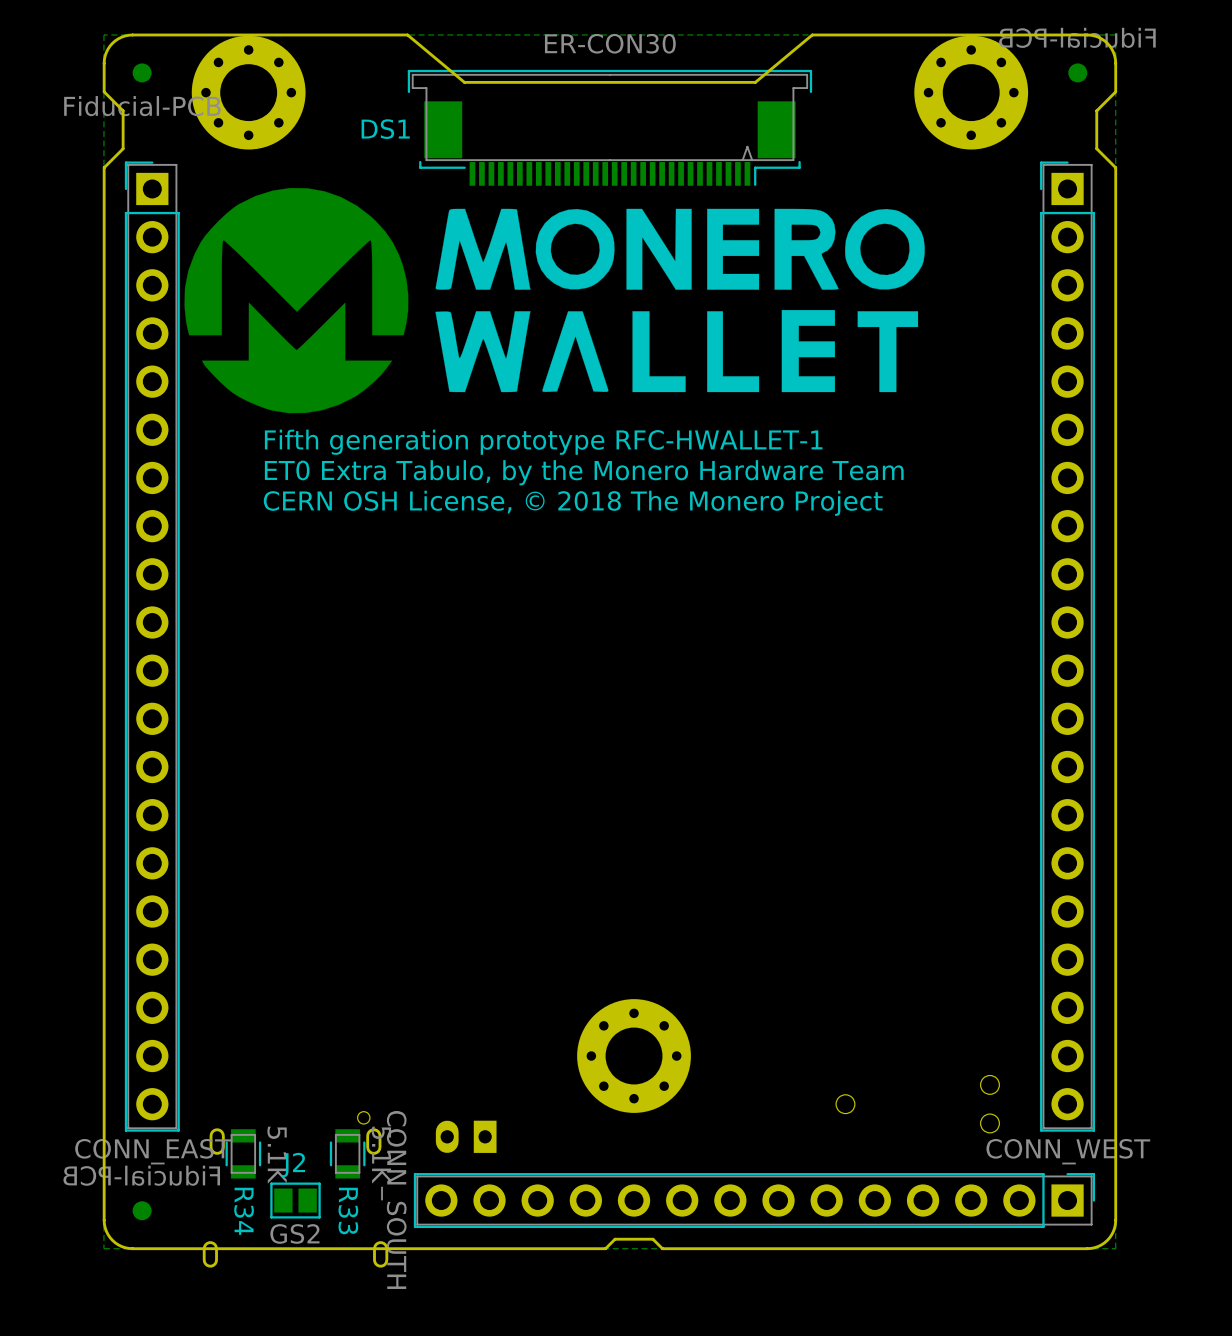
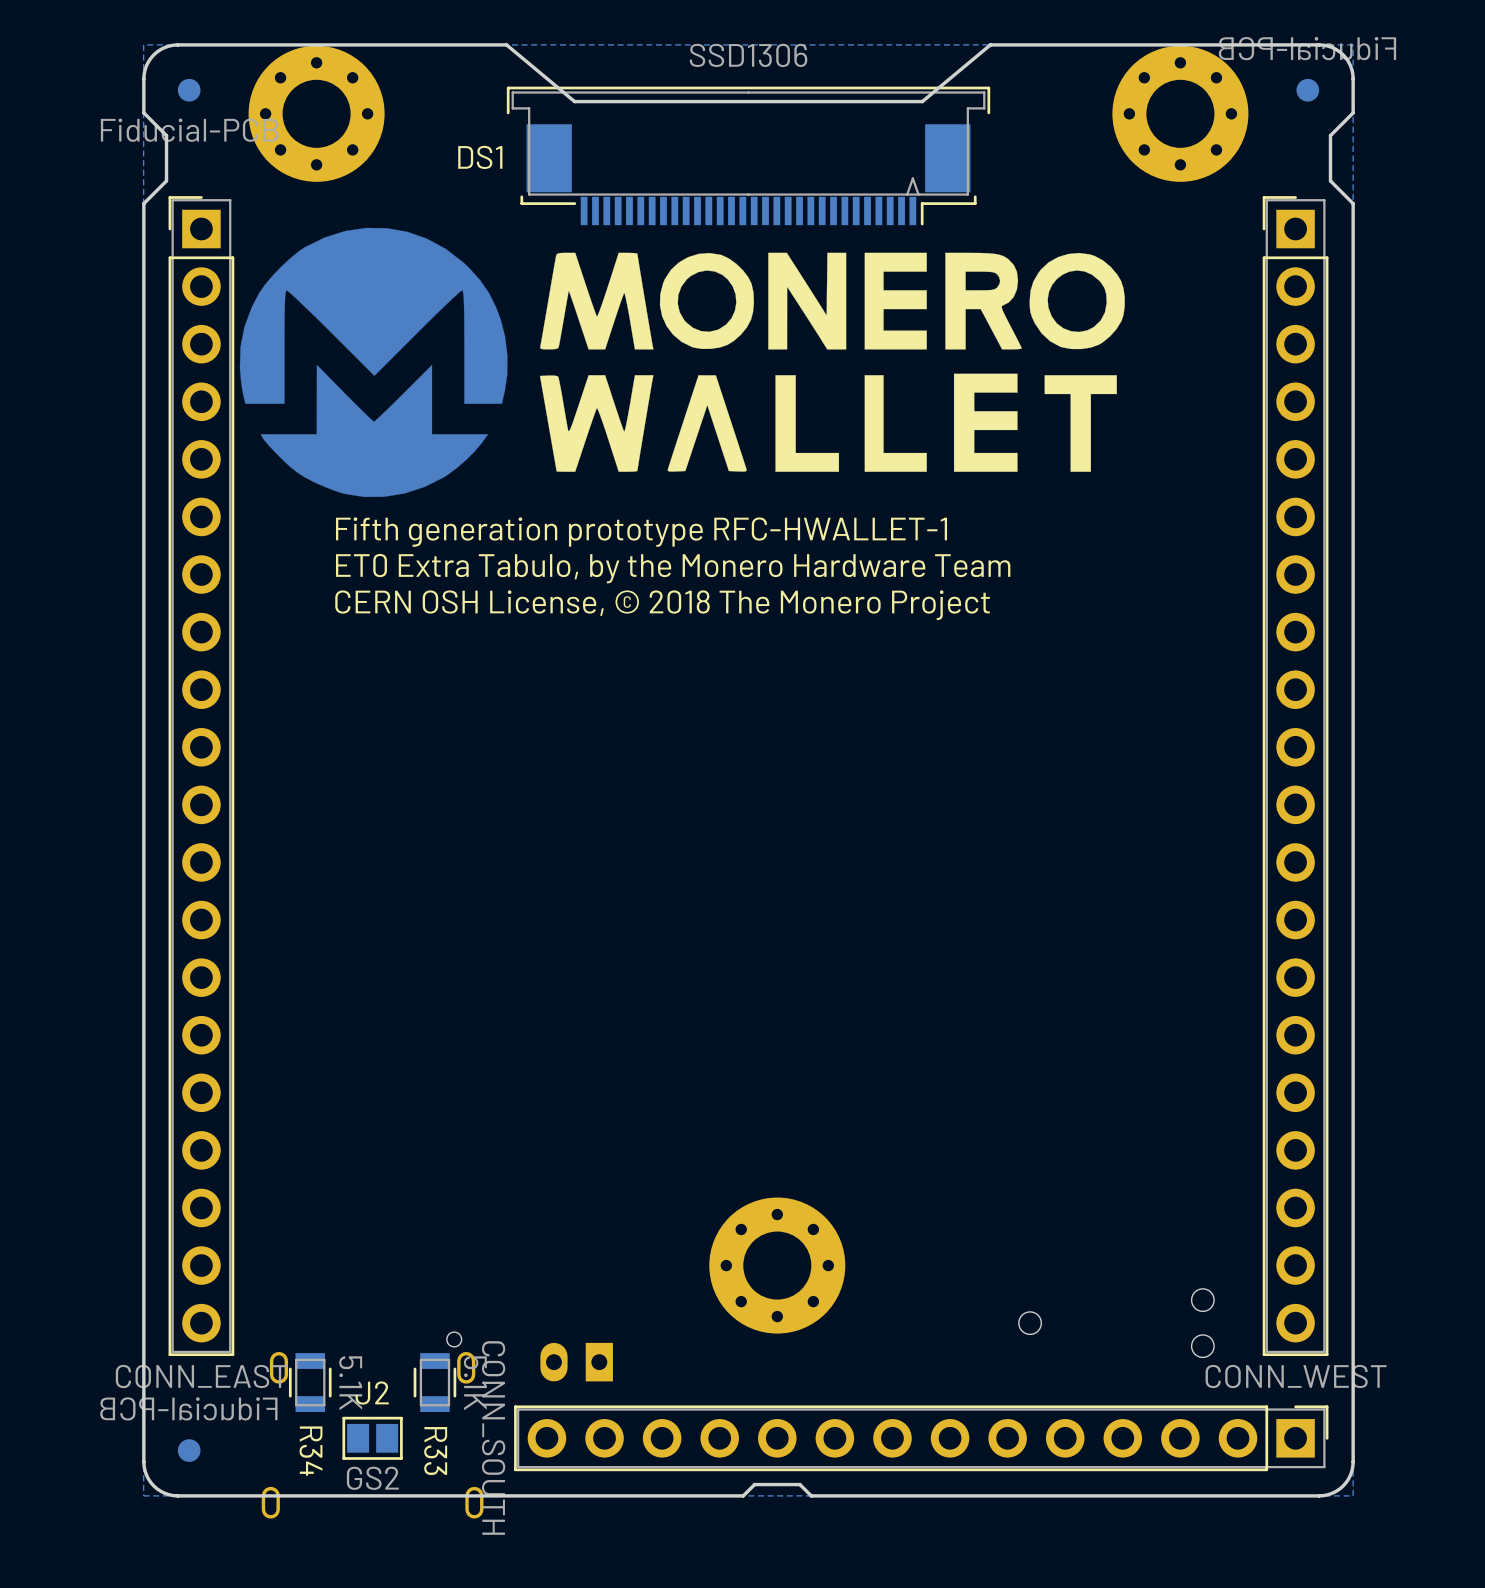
DS1 value: ER-CON30 (610, 43) -> SSD1306 (748, 55)

